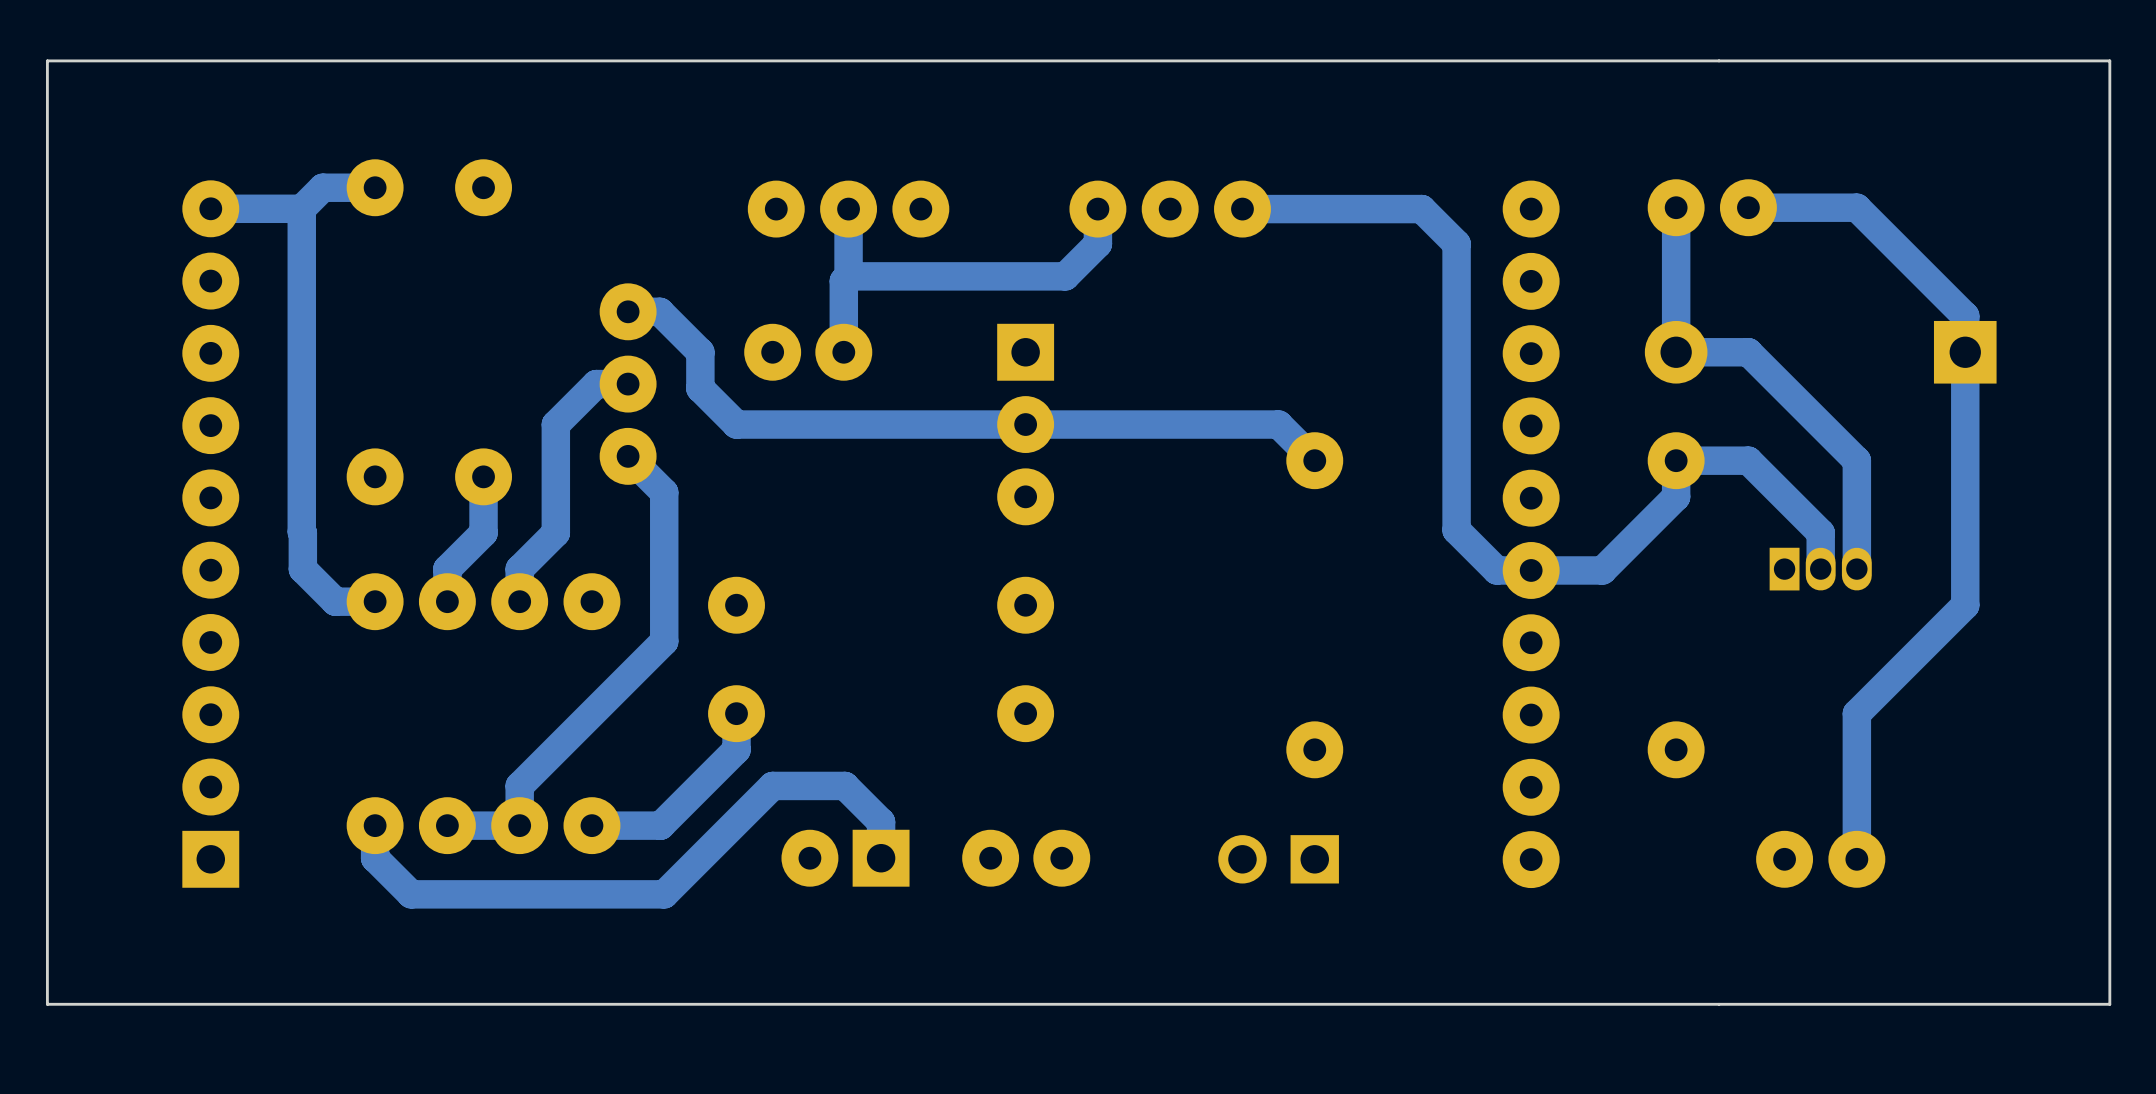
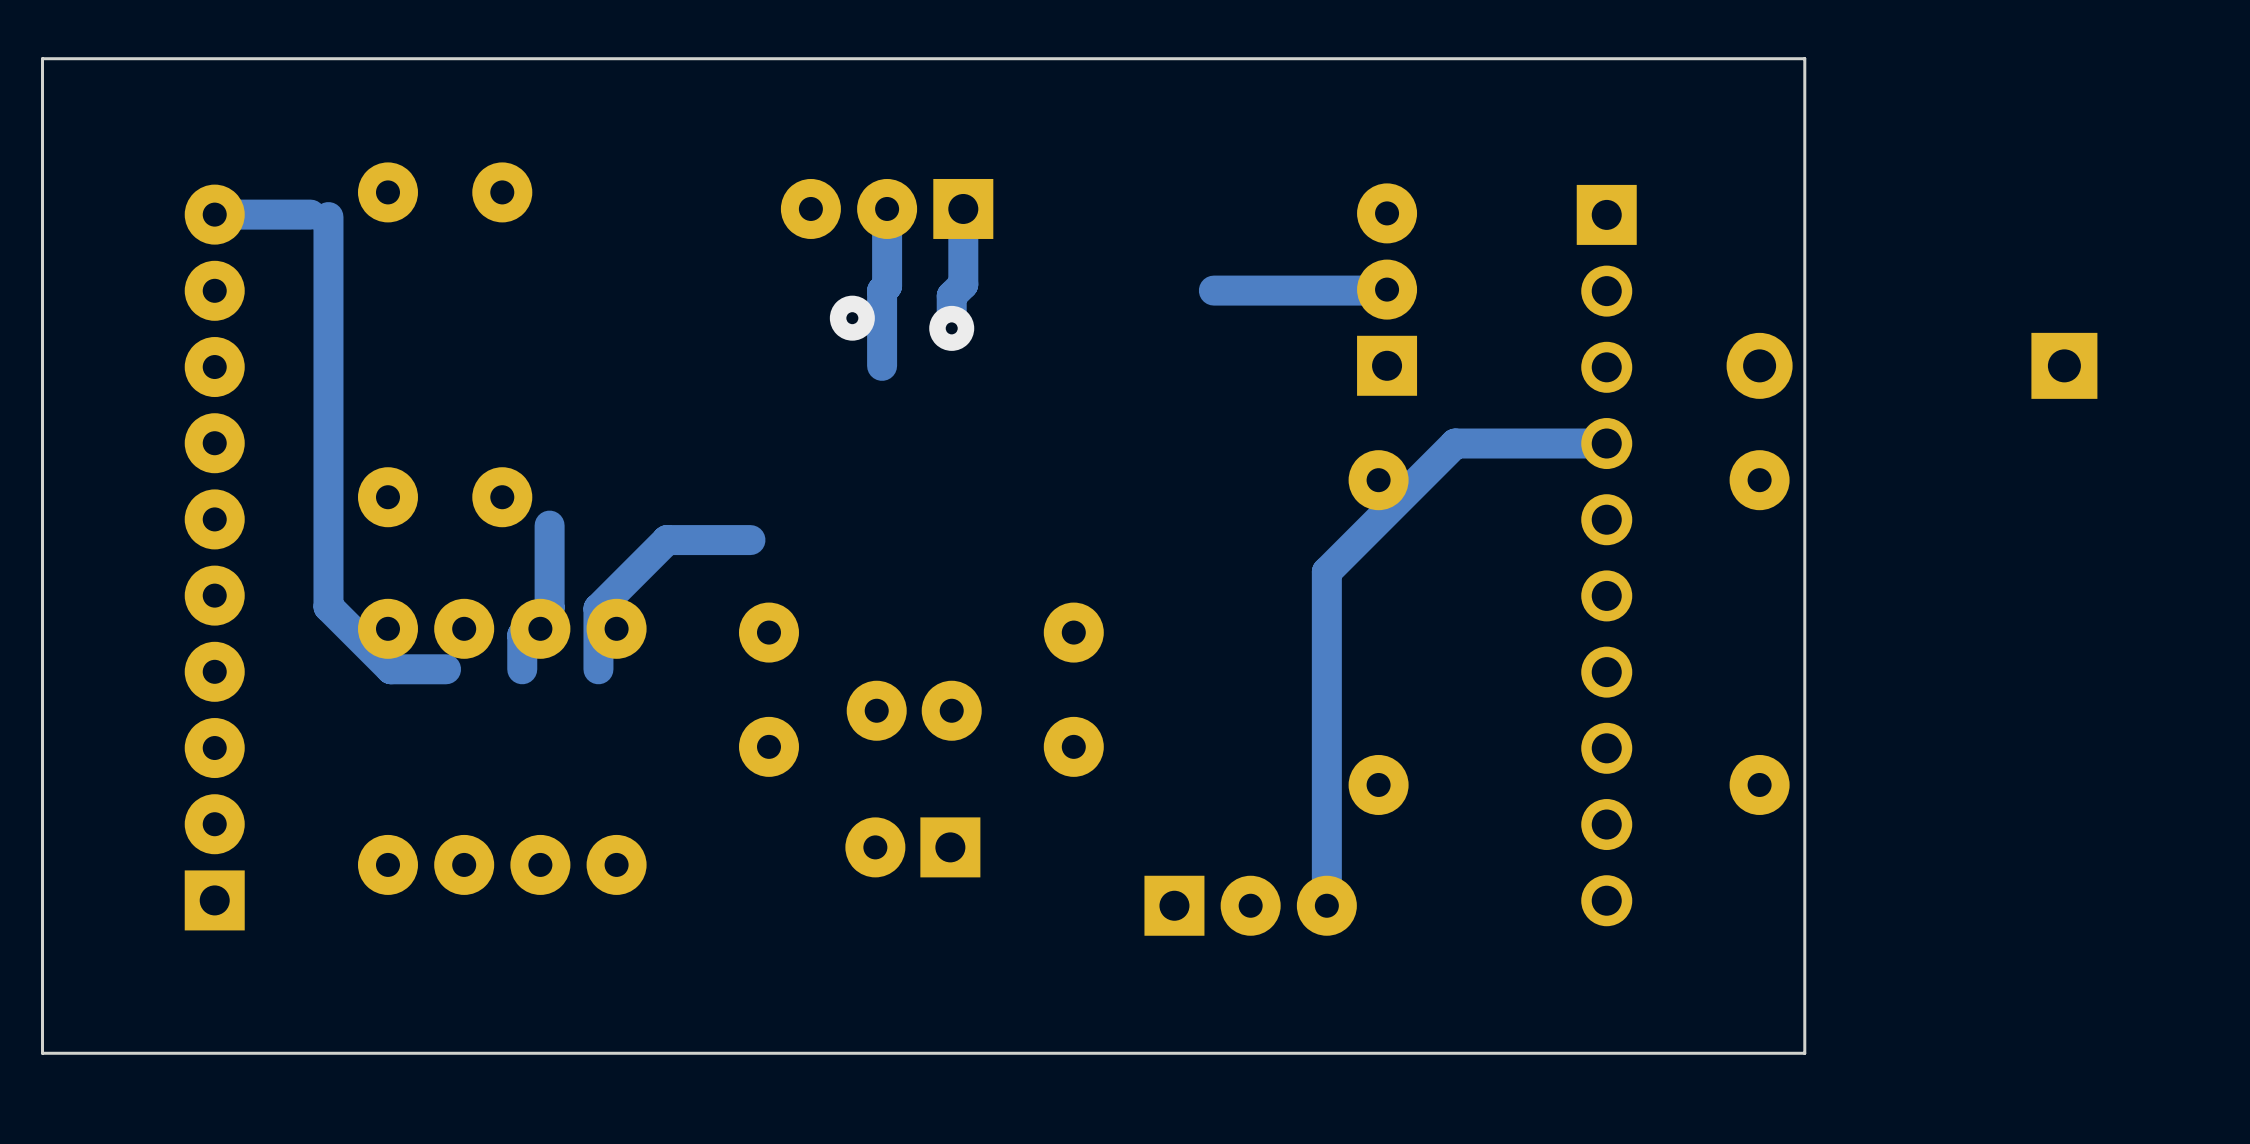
board edge: (1719, 60) (2109, 60) (2109, 1004) (1719, 1004) -> (1804, 58) (1804, 1053)
part footprint: [747, 180, 950, 238] -> [780, 178, 994, 239]
part footprint: [1502, 180, 1560, 889] -> [1576, 184, 1637, 927]
track: (375, 187) (322, 187) (301, 208) (302, 569) (335, 601) (375, 601) -> none
track: none -> (963, 208) (963, 284) (951, 295) (951, 328)
track: (1676, 207) (1676, 352) (1748, 352) (1856, 460) (1856, 569) -> none
part: (1712, 207) -> none
track: (1748, 207) (1856, 207) (1965, 316) (1965, 605) (1856, 713) (1856, 859) -> none
track: (1097, 209) (1097, 243) (1065, 276) (848, 276) -> none
part: (1170, 209) -> none
track: (1242, 209) (1421, 209) (1456, 243) (1456, 530) (1496, 570) (1602, 570) (1676, 496) (1676, 460) (1748, 460) (1820, 532) (1820, 569) -> none
track: none -> (328, 217) (328, 606) (391, 669) (446, 669)
track: none -> (1387, 289) (1213, 290)
part: none -> (1387, 289)
via: none -> (852, 318)
track: (628, 311) (659, 311) (700, 352) (700, 388) (736, 424) (1278, 424) (1314, 460) -> none
via: none -> (951, 328)
part: (808, 352) -> none
track: (628, 384) (596, 384) (555, 424) (555, 532) (519, 569) (519, 601) -> none
part: (628, 384) -> none
part: (1025, 424) -> none
track: none -> (1606, 443) (1455, 443) (1326, 571) (1326, 905)
track: (628, 456) (664, 492) (664, 641) (519, 785) (519, 825) (447, 825) -> none
track: (483, 476) (483, 532) (447, 569) (447, 601) -> none
track: none -> (549, 525) (549, 607) (522, 635) (522, 669)
track: none -> (750, 540) (667, 540) (598, 608) (598, 669)
part: (1820, 569) -> none
part: none -> (914, 710)
track: (736, 713) (736, 749) (660, 825) (591, 825) -> none
track: (375, 825) (375, 858) (411, 894) (664, 894) (772, 785) (844, 785) (881, 822) (881, 858) -> none
part position: (845, 858) -> (912, 847)
part: (1026, 858) -> none
part: (1278, 859) -> none
part: (1820, 859) -> none
part: none -> (1250, 905)

